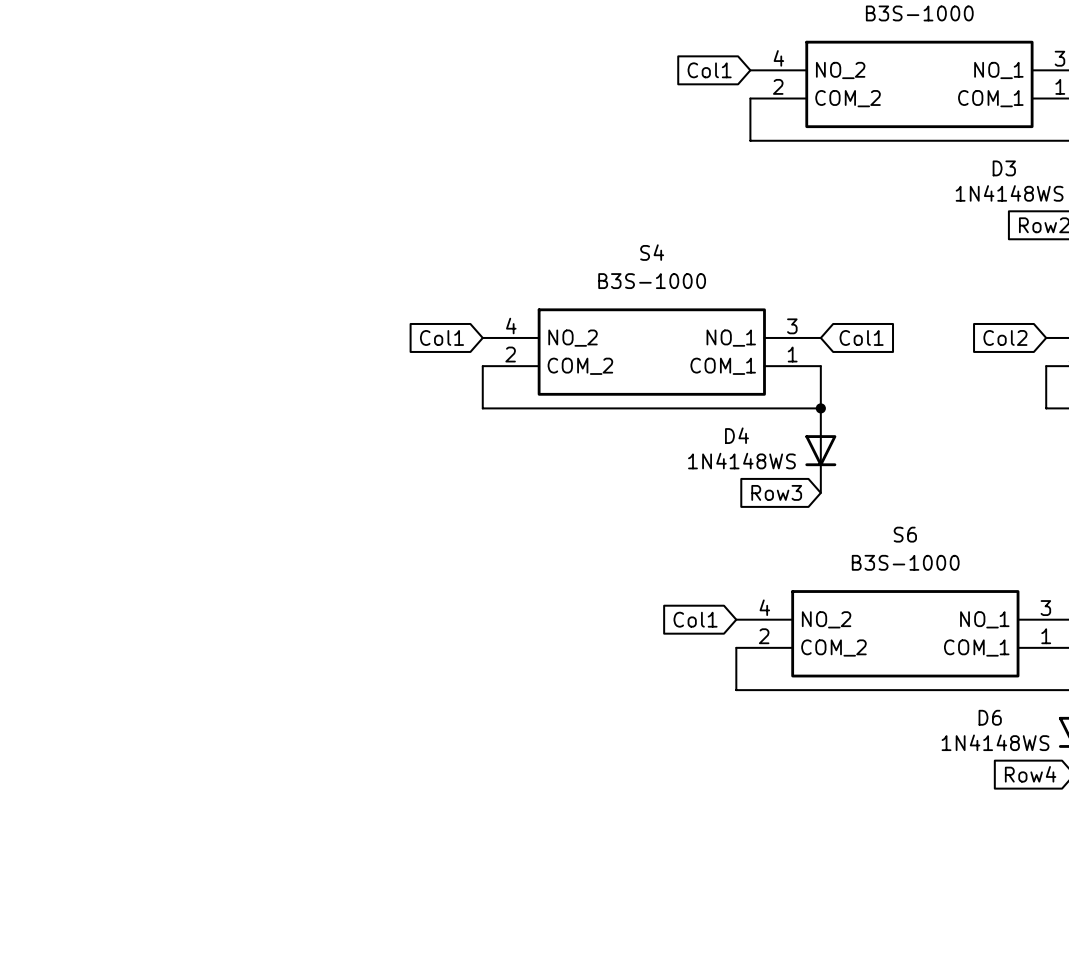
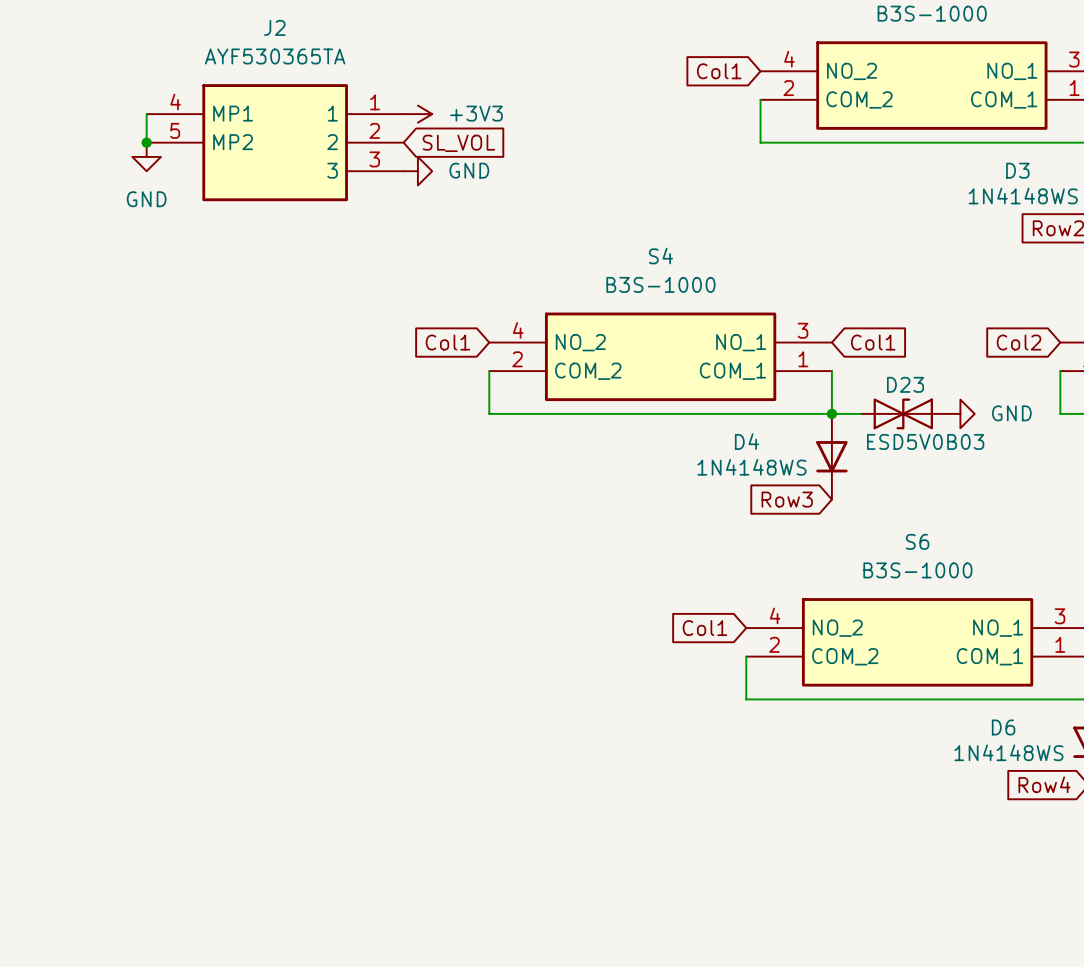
wire: none -> (146, 114) (146, 142)
power symbol: none -> +3V3 (417, 114)
junction: none -> (146, 142)
J2: none -> AYF530365TA (275, 142)
global label: none -> SL_VOL (458, 143)
power symbol: none -> GND (146, 156)
power symbol: none -> GND (417, 171)
wire: none -> (831, 413) (860, 413)
D23: none -> ESD5V0B03 (903, 413)
power symbol: none -> GND (960, 413)

